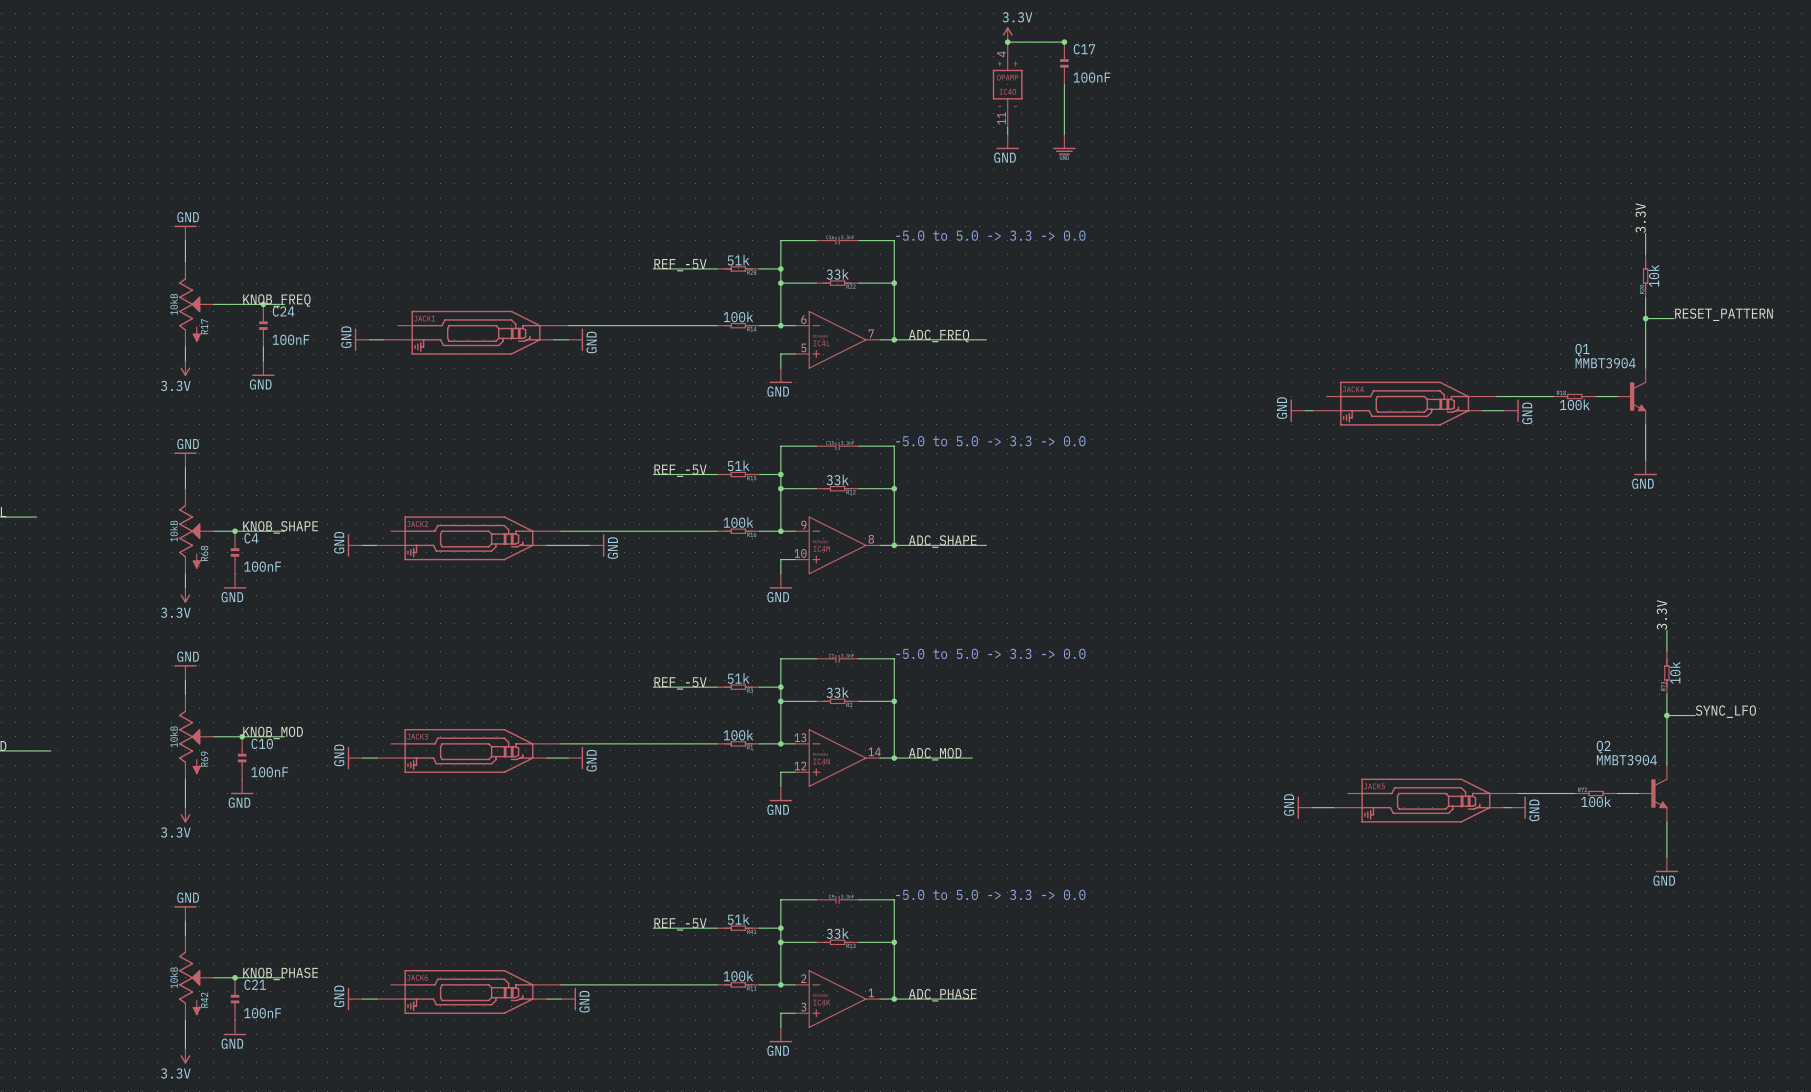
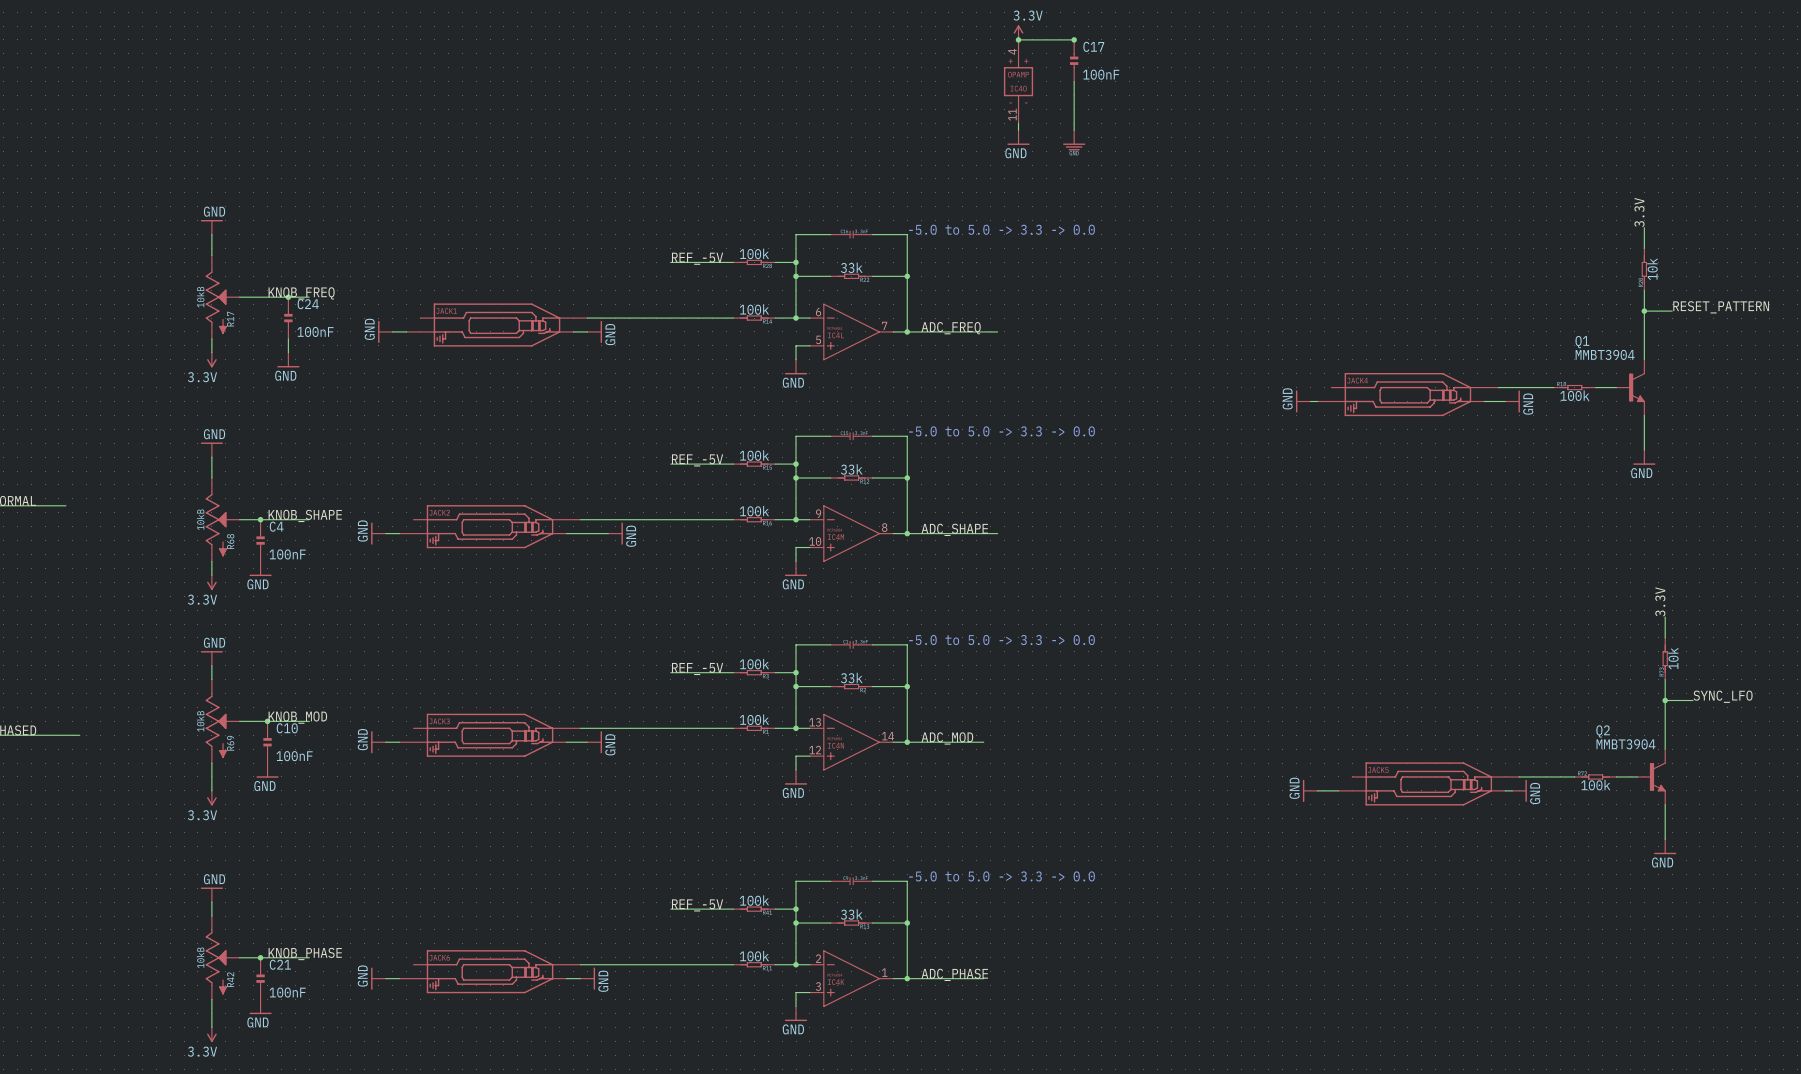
part value: 51k (738, 260) -> 100k (754, 253)
part value: 51k (738, 465) -> 100k (754, 455)
part value: 51k (738, 678) -> 100k (754, 664)
part value: 51k (738, 919) -> 100k (754, 900)

